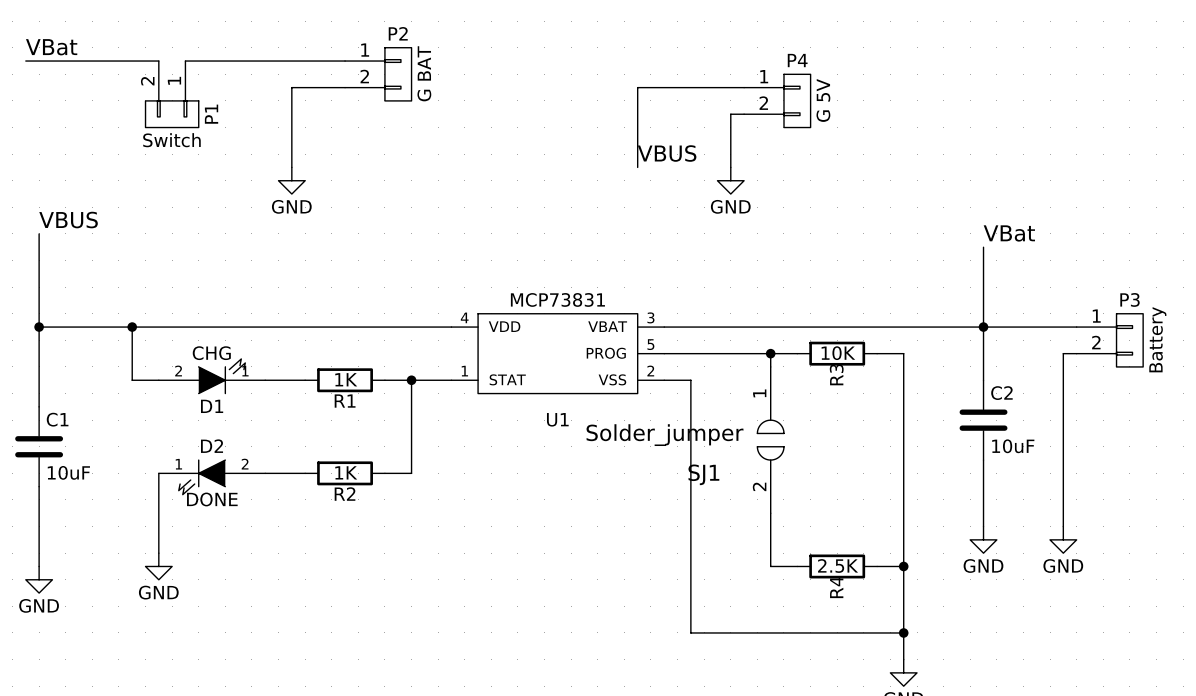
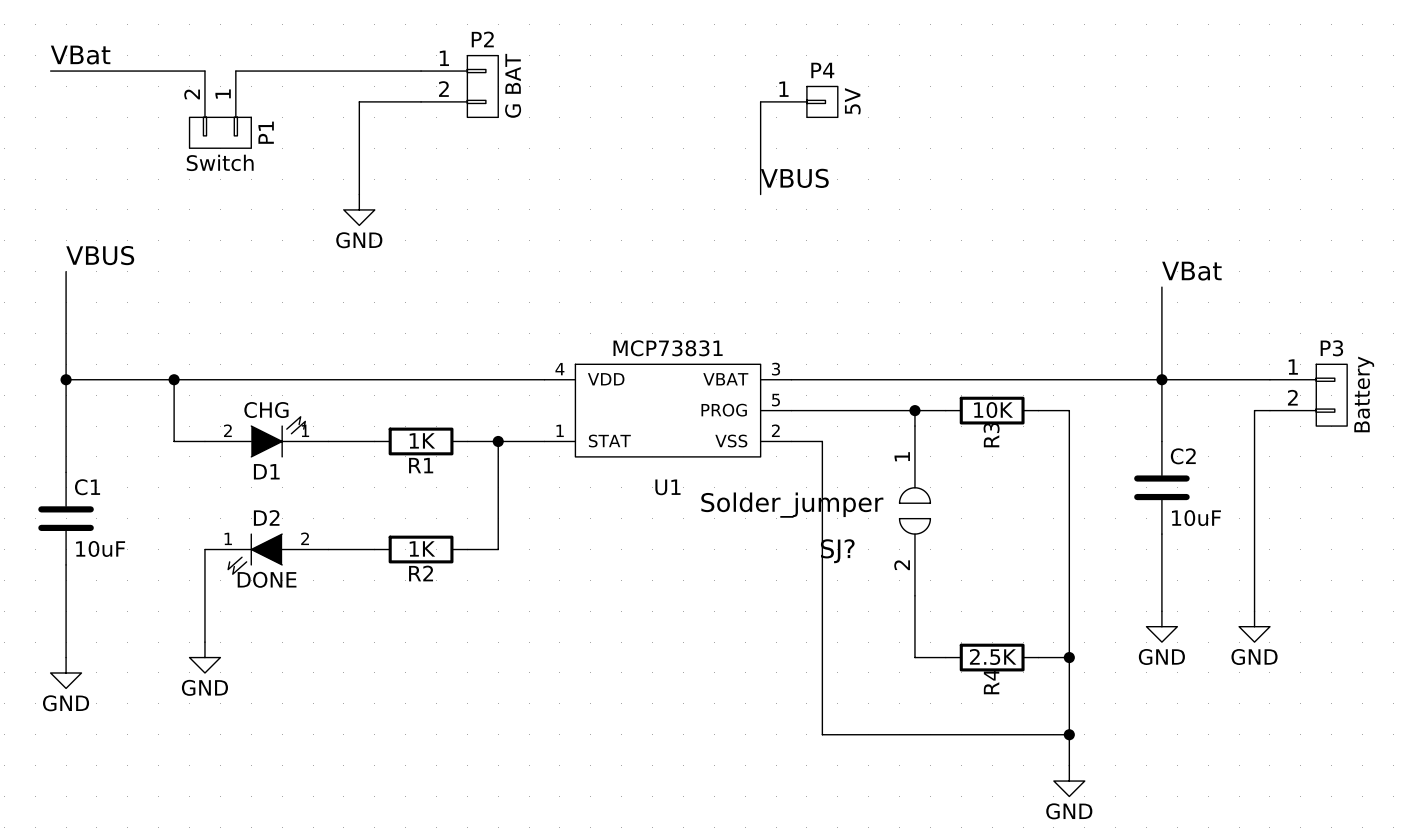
P4 symbol: [744, 74, 811, 128] -> [760, 86, 838, 118]
wire: (637, 87) (744, 87) -> none
P4 value: G 5V (823, 100) -> 5V (852, 101)
wire: (744, 114) (730, 114) (730, 167) -> none
power symbol: GND (730, 180) -> none
SJ1 name: SJ1 (703, 474) -> SJ? (837, 551)

